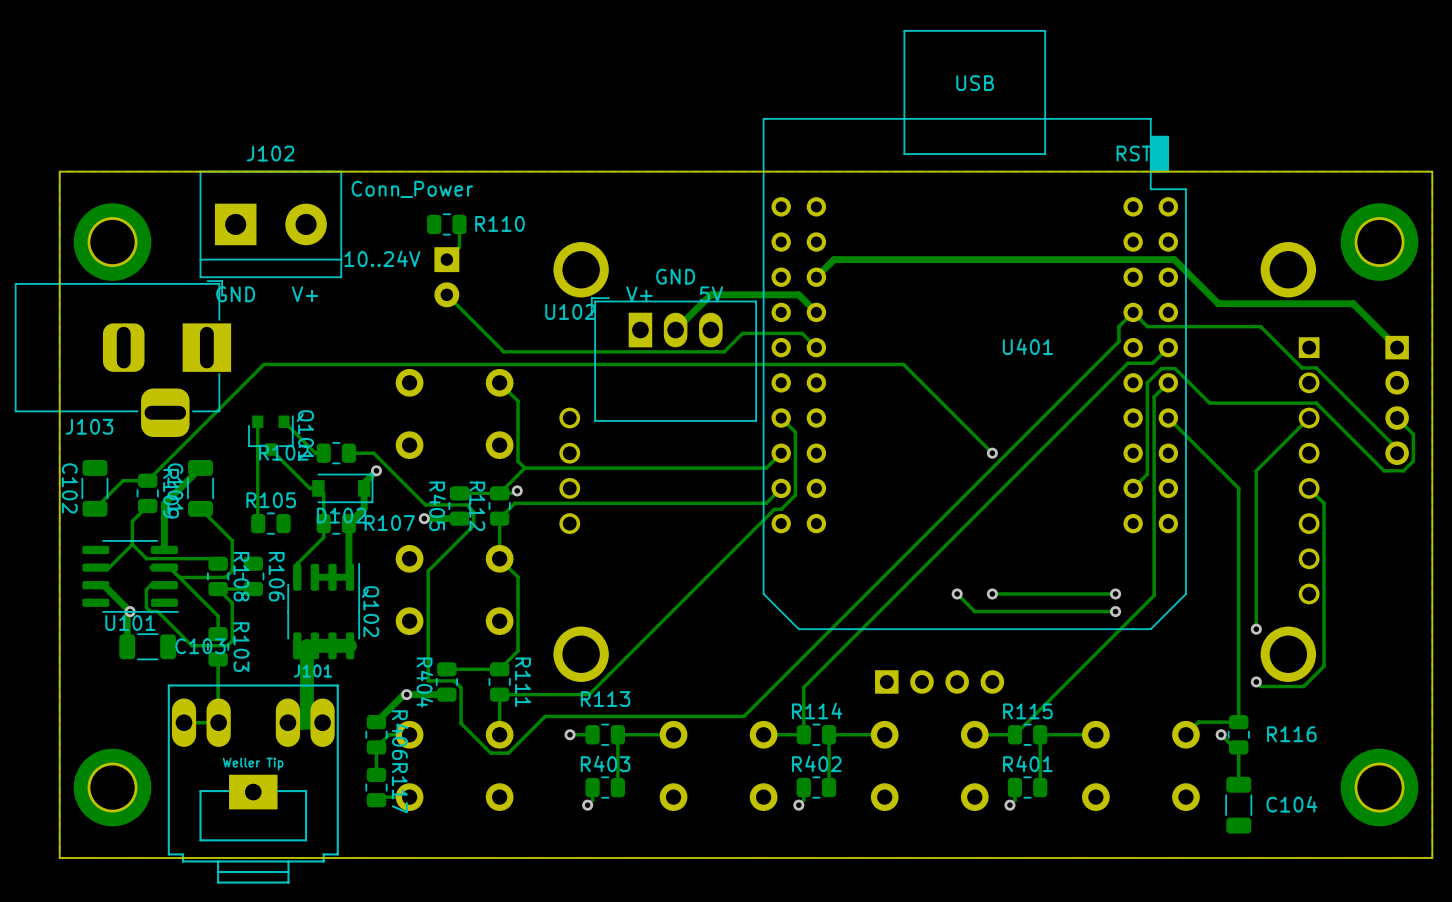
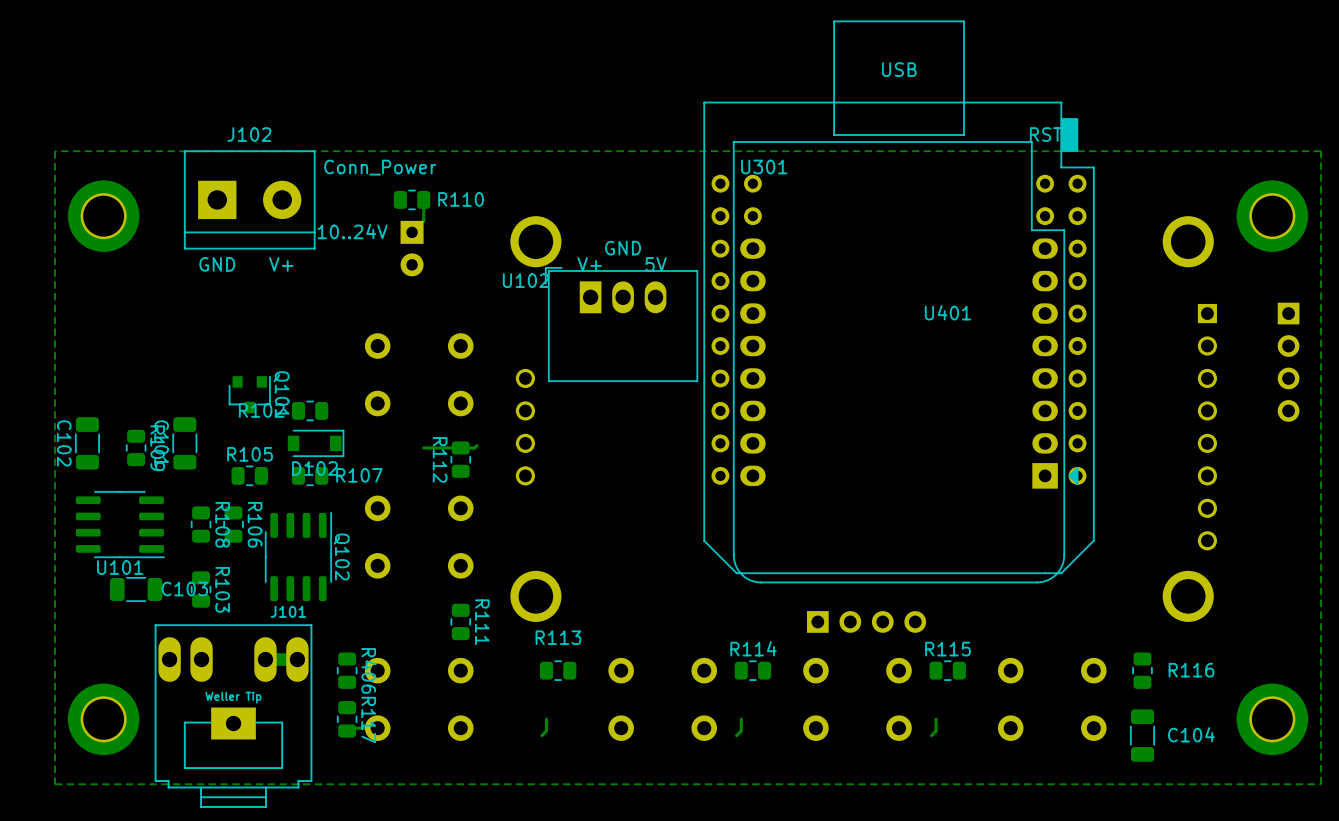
board edge: (1432, 171) (59, 171) (59, 857) (1432, 857) (1432, 171) -> none
track: (816, 277) (834, 259) (1174, 259) (1218, 303) (1353, 303) (1397, 347) -> none
track: (446, 294) (503, 351) (724, 351) (742, 333) (802, 333) (816, 347) -> none
track: (816, 312) (798, 294) (710, 294) (675, 330) -> none
track: (1168, 347) (1152, 363) (1127, 363) (803, 687) (803, 734) (763, 734) -> none
J103: (122, 358) -> none
track: (499, 382) (518, 401) (518, 461) (524, 468) -> none
track: (1168, 382) (1154, 397) (1154, 595) (1014, 734) (974, 734) -> none
U301: none -> (905, 362)
track: (781, 418) (795, 432) (795, 495) (781, 509) (774, 509) (589, 694) (499, 694) (499, 734) -> none
track: (1168, 418) (1238, 488) (1238, 722) (1198, 722) (1185, 734) -> none
track: (1309, 418) (1256, 470) (1256, 629) -> none
track: (1397, 418) (1413, 434) (1413, 461) (1403, 470) (1383, 470) (1316, 403) (1209, 403) (1175, 368) (1161, 368) (1147, 382) (1147, 474) (1133, 488) -> none
track: (257, 421) (258, 523) -> none
track: (284, 421) (315, 453) (323, 453) -> none
track: (270, 449) (309, 488) (318, 488) (323, 493) (323, 537) (297, 563) (297, 577) -> none
track: (781, 453) (766, 468) (524, 468) -> none
track: (992, 453) (903, 364) (263, 364) (147, 480) (123, 480) (94, 508) -> none
via: (992, 453) -> none
track: (1397, 453) (1397, 448) (1316, 367) (1301, 367) (1260, 326) (1147, 326) (1133, 312) (1118, 326) (1118, 341) (744, 716) (545, 716) (508, 753) (490, 753) (461, 723) (461, 687) (454, 680) (428, 680) (428, 571) (473, 525) (473, 511) (466, 504) (425, 504) (373, 453) (348, 453) -> none
track: (200, 467) (164, 504) (164, 549) -> none
track: (524, 468) (499, 493) -> none
track: (376, 470) (364, 483) (364, 508) (348, 523) (350, 577) (314, 577) -> none
via: (376, 470) -> none
track: (781, 488) (766, 503) (515, 503) (499, 518) (499, 558) (518, 577) (518, 650) (499, 669) (446, 669) -> none
track: (1309, 488) (1324, 503) (1324, 666) (1303, 686) (1260, 686) (1256, 681) -> none
via: (517, 490) -> none
track: (147, 506) (132, 521) (132, 544) -> none
R405: (459, 506) -> none
track: (200, 508) (232, 540) (232, 570) (225, 577) (179, 577) -> none
via: (424, 518) -> none
track: (459, 518) (424, 518) -> none
track: (132, 544) (109, 567) (95, 567) -> none
track: (132, 544) (146, 558) (213, 558) (218, 563) (218, 558) -> none
track: (150, 567) (169, 567) (218, 616) (218, 634) -> none
track: (95, 585) (103, 585) (130, 611) (127, 614) (127, 646) -> none
track: (164, 585) (150, 585) (146, 589) (146, 607) (150, 611) (157, 611) (191, 645) (227, 645) (232, 641) (232, 603) (218, 589) (253, 589) -> none
track: (957, 593) (974, 611) (1115, 611) -> none
via: (957, 593) -> none
via: (992, 593) -> none
track: (1115, 593) (992, 593) -> none
via: (1115, 593) -> none
via: (130, 611) -> none
via: (1115, 611) -> none
via: (1256, 629) -> none
track: (306, 645) (306, 716) (300, 722) -> none
track: (350, 645) (297, 645) -> none
track: (218, 659) (218, 722) (184, 722) -> none
R404: (446, 681) -> none
via: (1256, 681) -> none
via: (406, 694) -> none
track: (446, 694) (403, 694) (376, 722) -> none
track: (409, 734) (389, 734) (376, 747) (376, 774) -> none
via: (570, 734) -> none
track: (592, 734) (570, 734) -> none
track: (673, 734) (617, 734) (617, 787) -> none
track: (884, 734) (829, 734) (829, 787) -> none
track: (1095, 734) (1040, 734) (1040, 787) -> none
track: (1221, 734) (1233, 747) (1238, 747) (1238, 784) -> none
via: (1221, 734) -> none
R403: (605, 787) -> none
R402: (816, 787) -> none
R401: (1027, 787) -> none
via: (587, 805) -> none
via: (798, 805) -> none
via: (1009, 805) -> none

